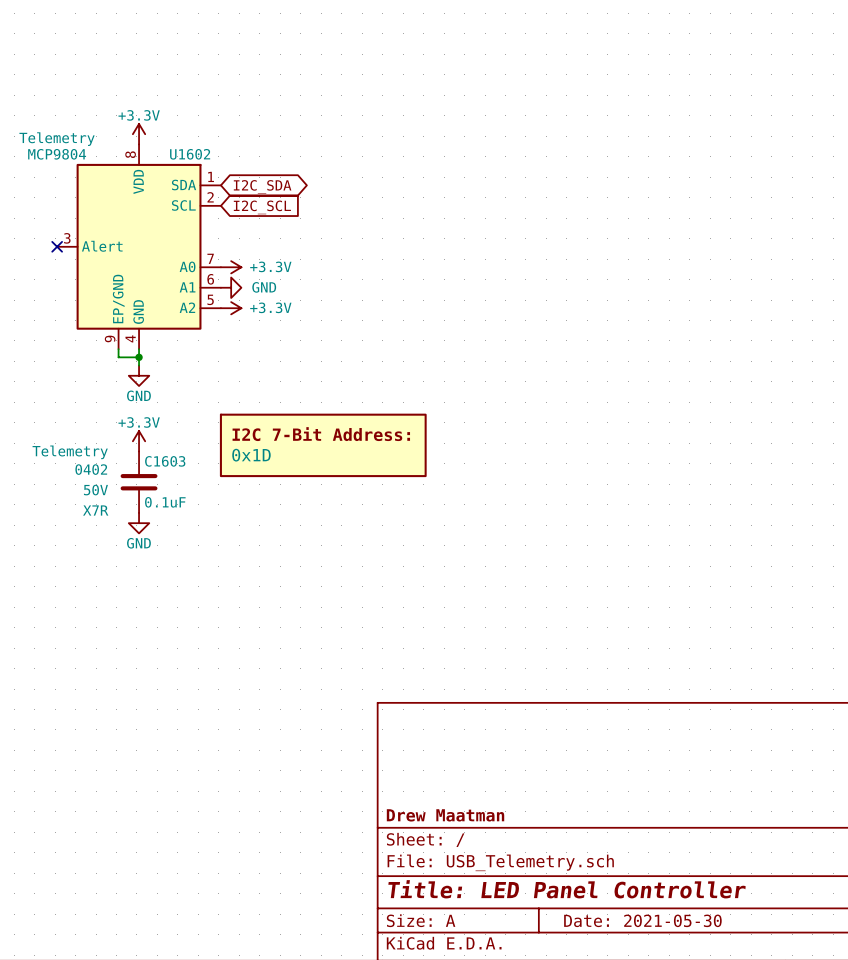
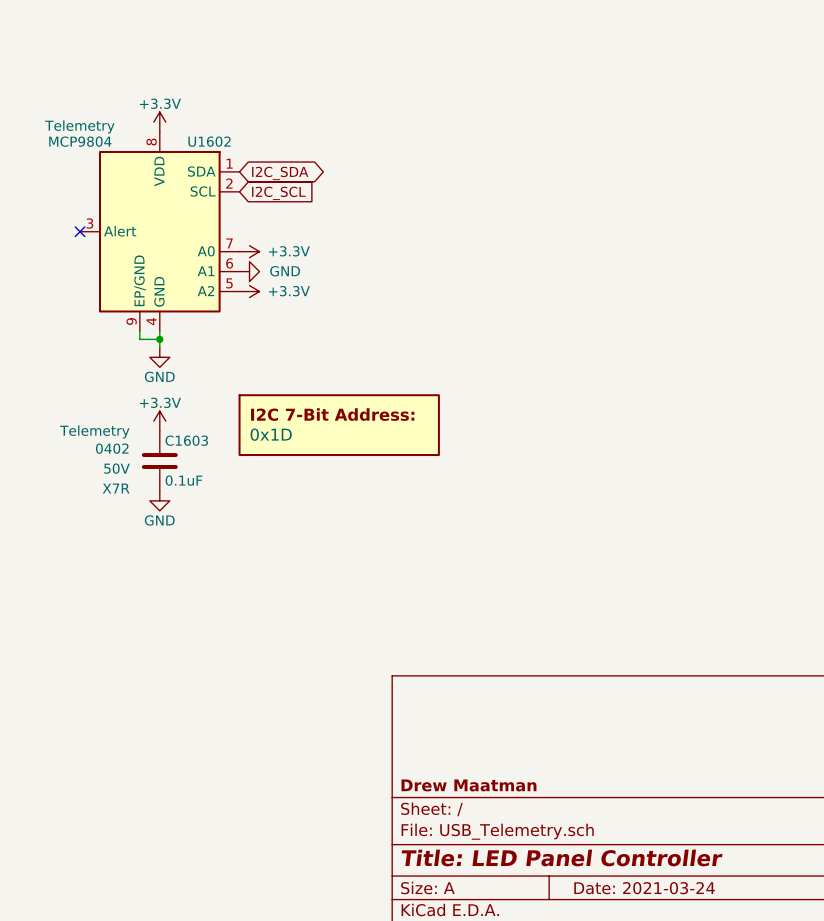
title block: Date: 2021-05-30 (642, 920) -> Date: 2021-03-24 (644, 888)

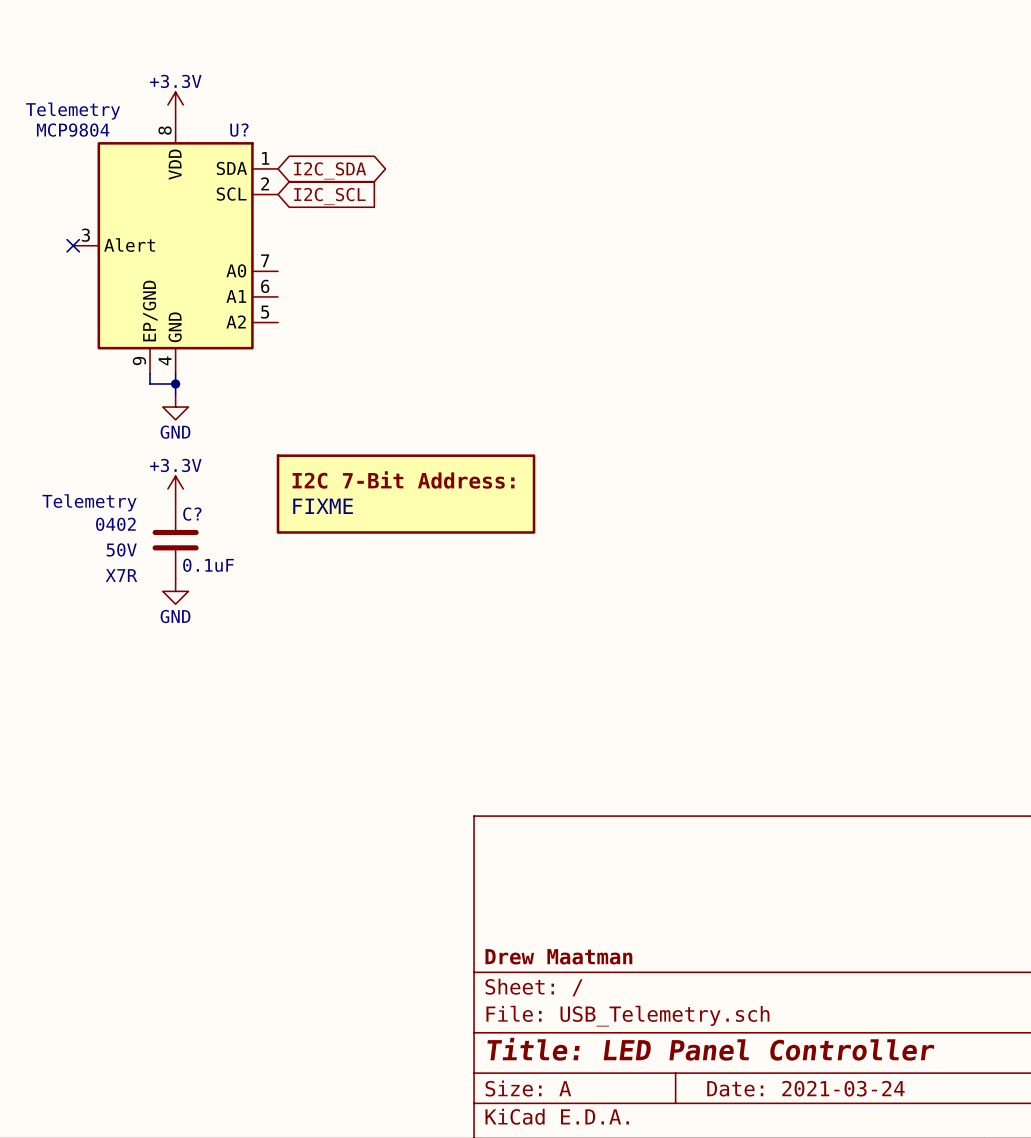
U1602 name: U1602 (209, 141) -> U? (239, 130)
power symbol: +3.3V (249, 251) -> none
power symbol: GND (249, 271) -> none
power symbol: +3.3V (249, 291) -> none
part value: 0x1D (271, 434) -> FIXME (323, 506)
C1603 name: C1603 (186, 440) -> C? (192, 514)

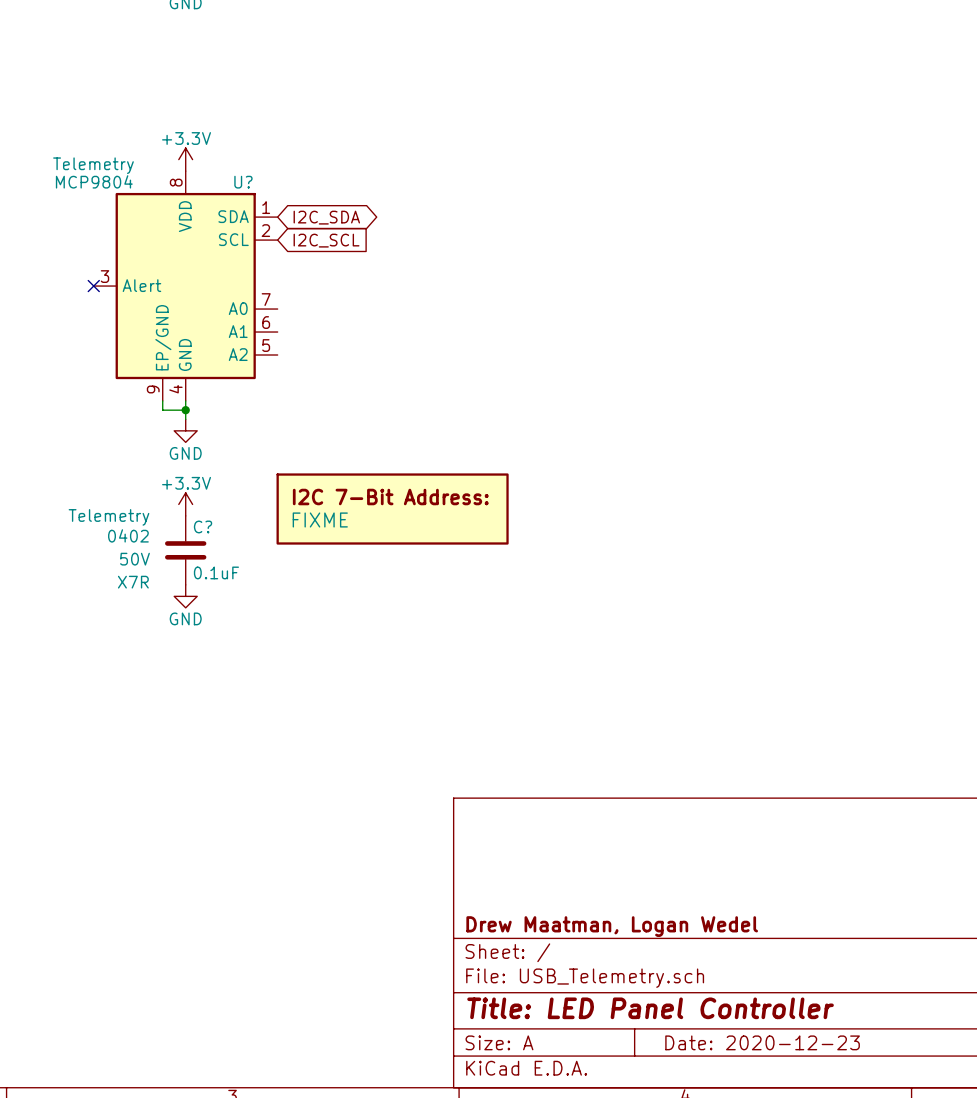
title block: Drew Maatman (558, 956) -> Drew Maatman, Logan Wedel (612, 926)
title block: Date: 2021-03-24 (805, 1088) -> Date: 2020-12-23 (762, 1042)

